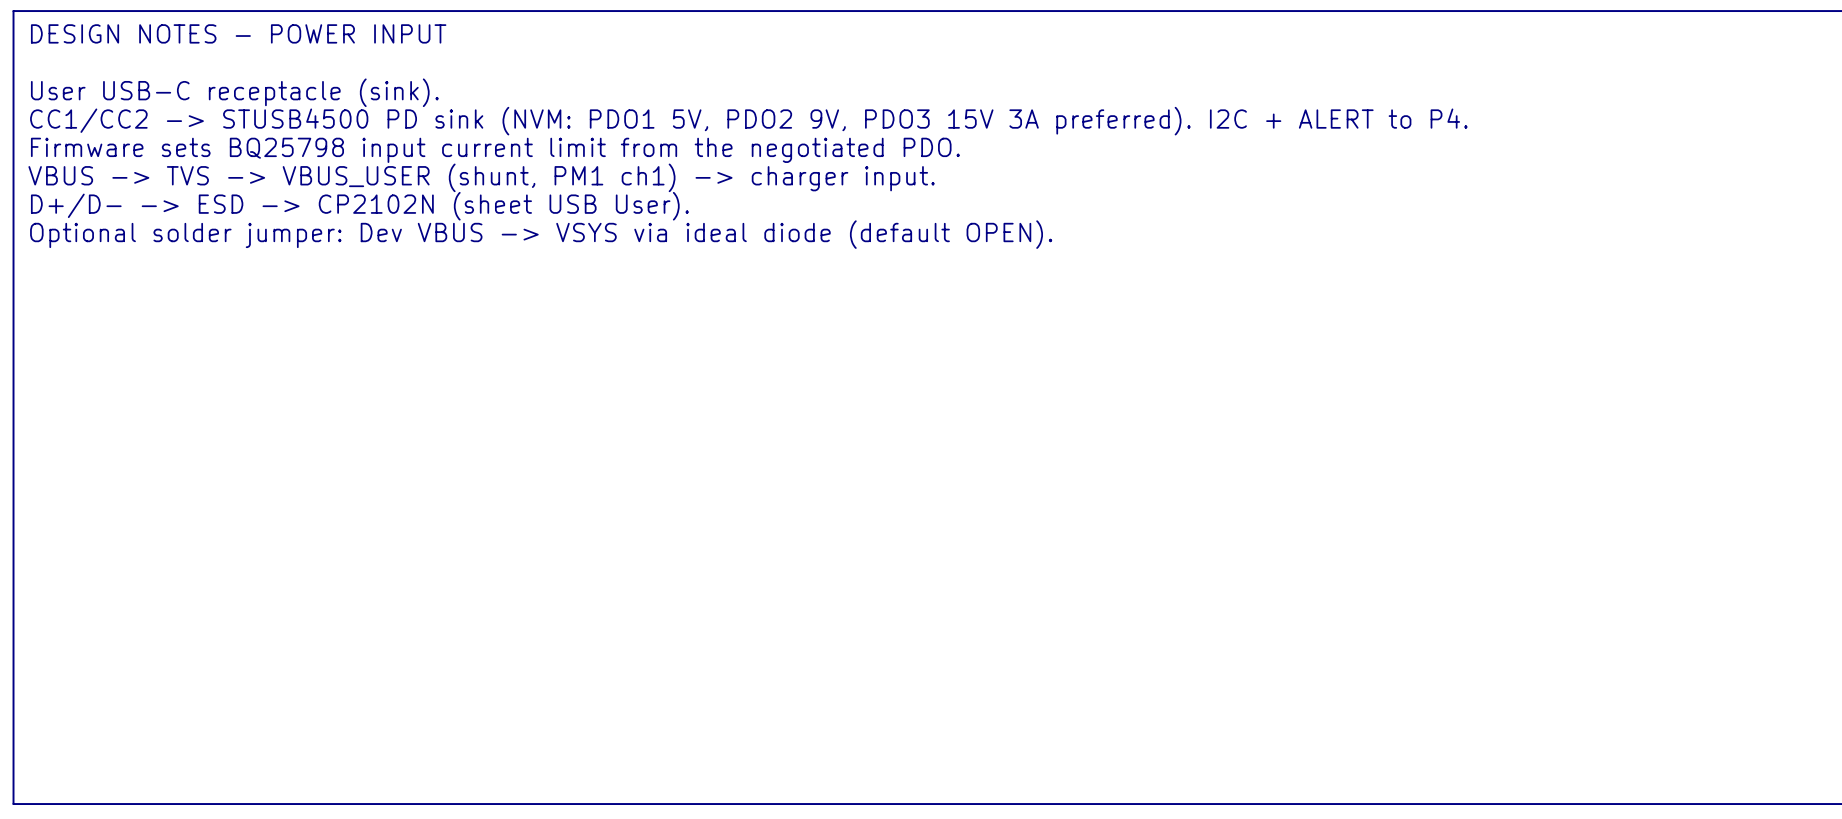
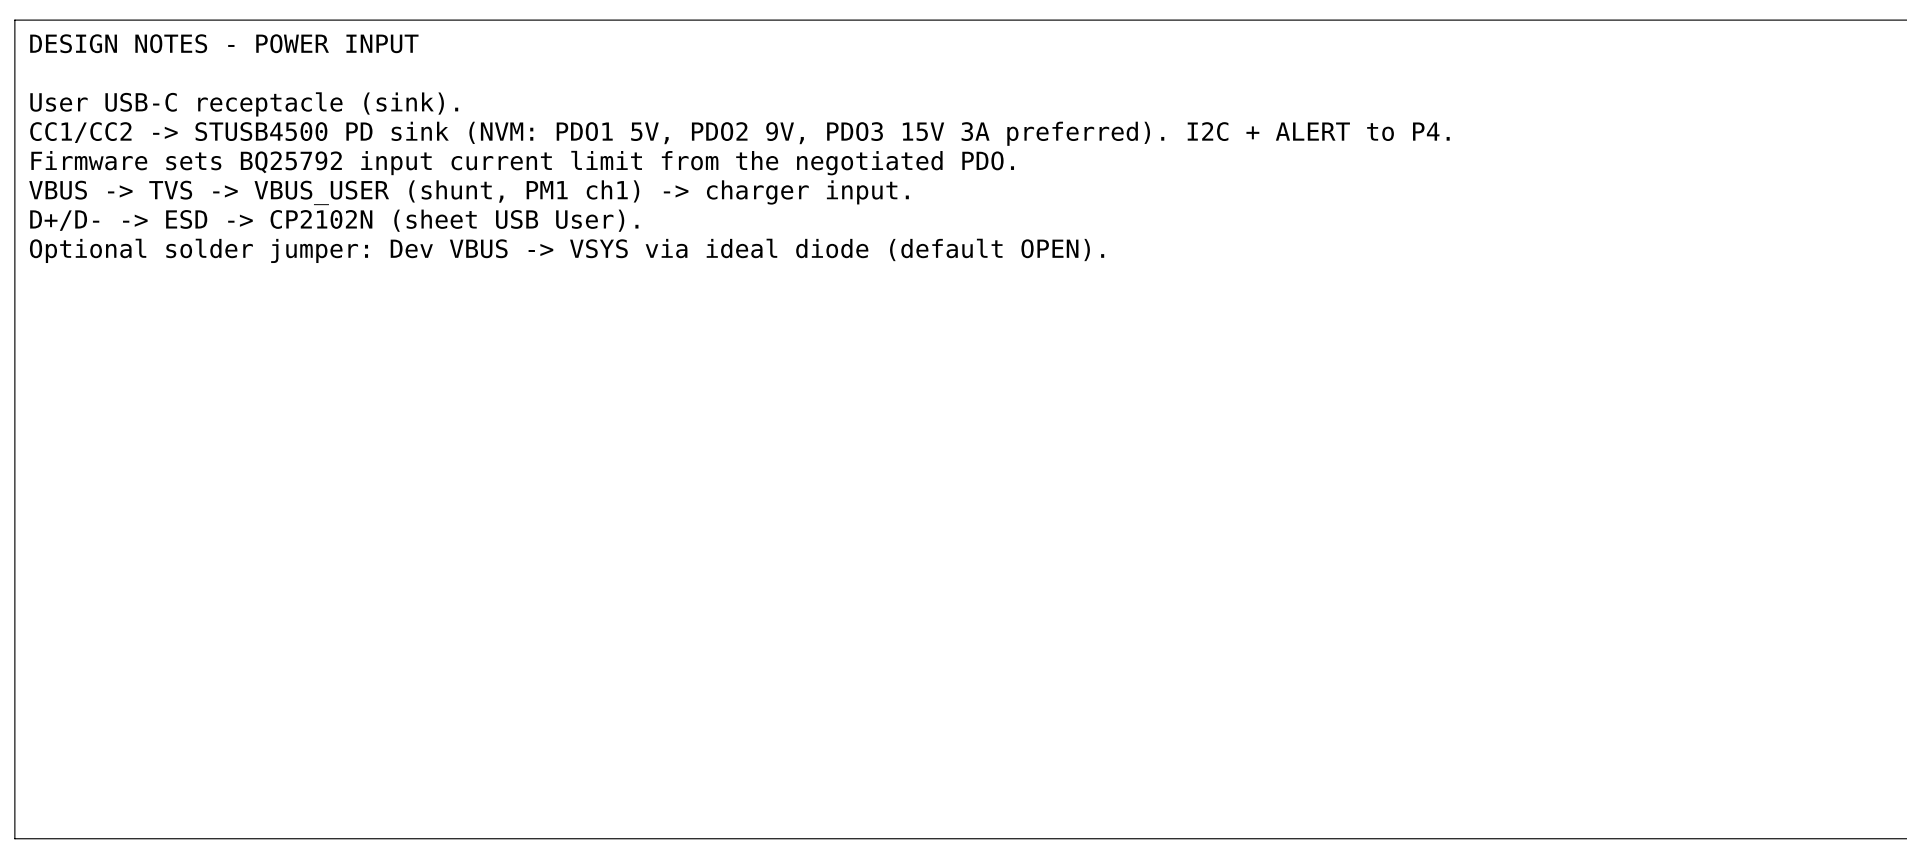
text: Firmware sets BQ25798 input current limit from the negotiated PDO. (495, 150) -> Firmware sets BQ25792 input current limit from the negotiated PDO. (522, 163)

